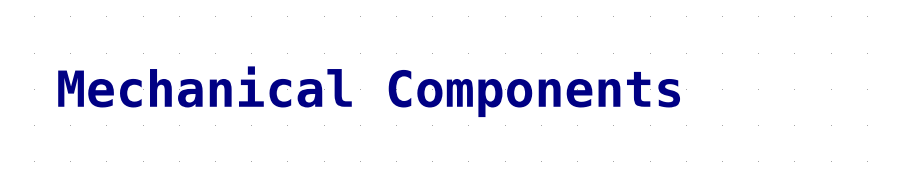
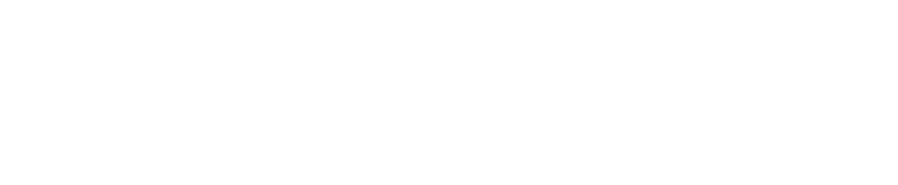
text: Mechanical Components (369, 91) -> none

